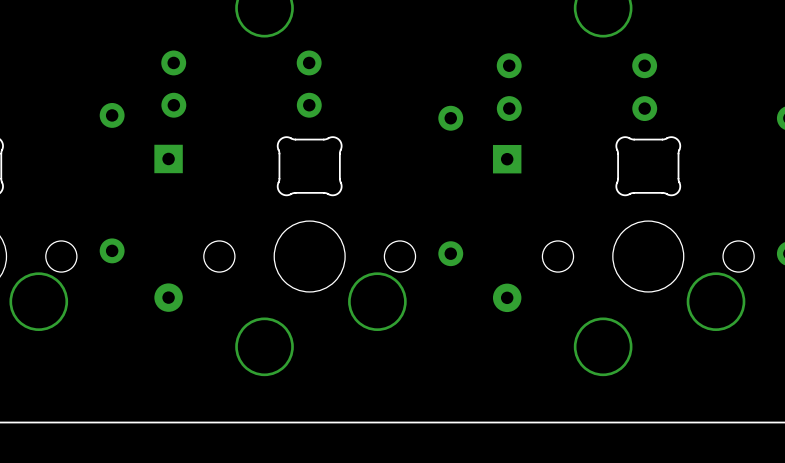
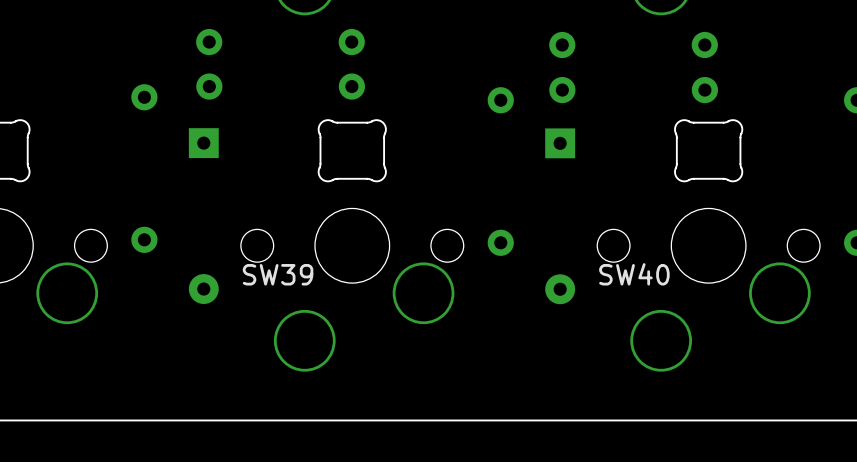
text: none -> SW40 (634, 274)
text: none -> SW39 (278, 274)

